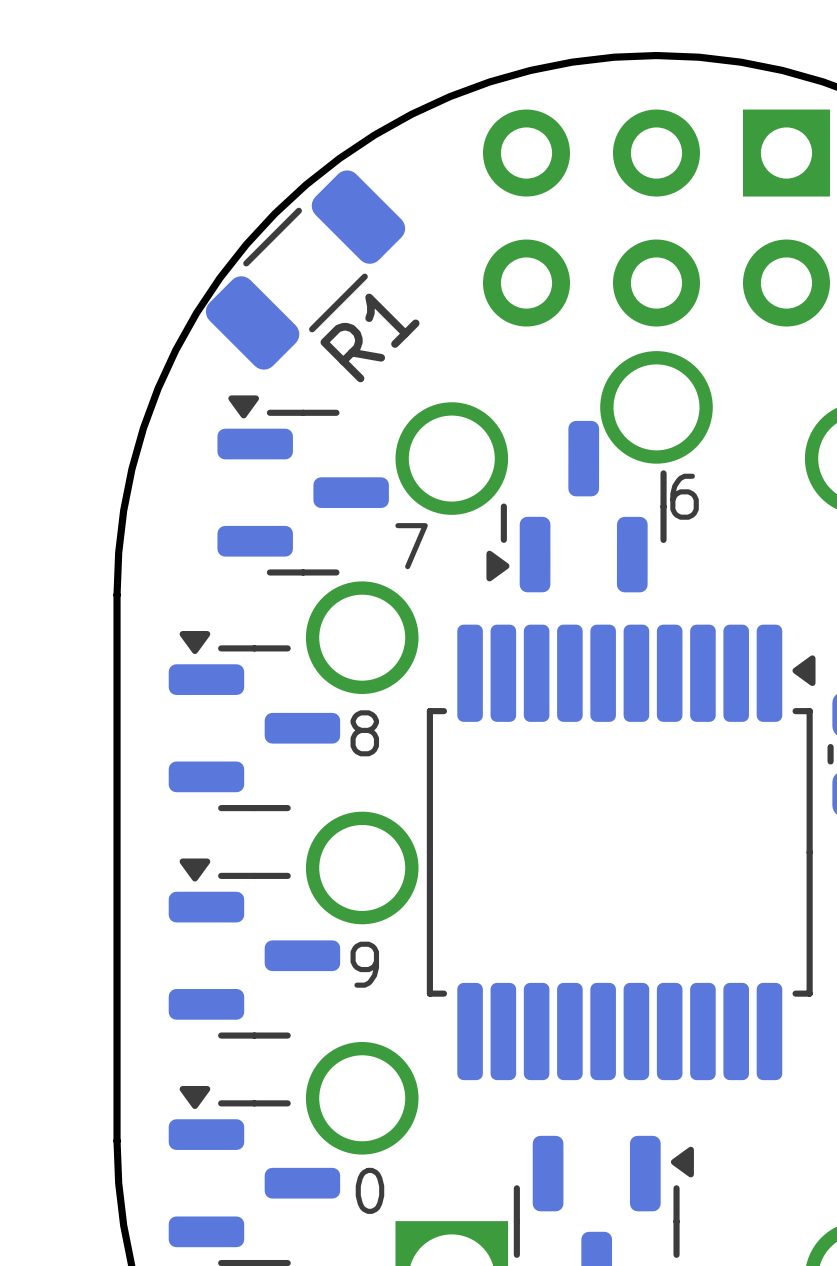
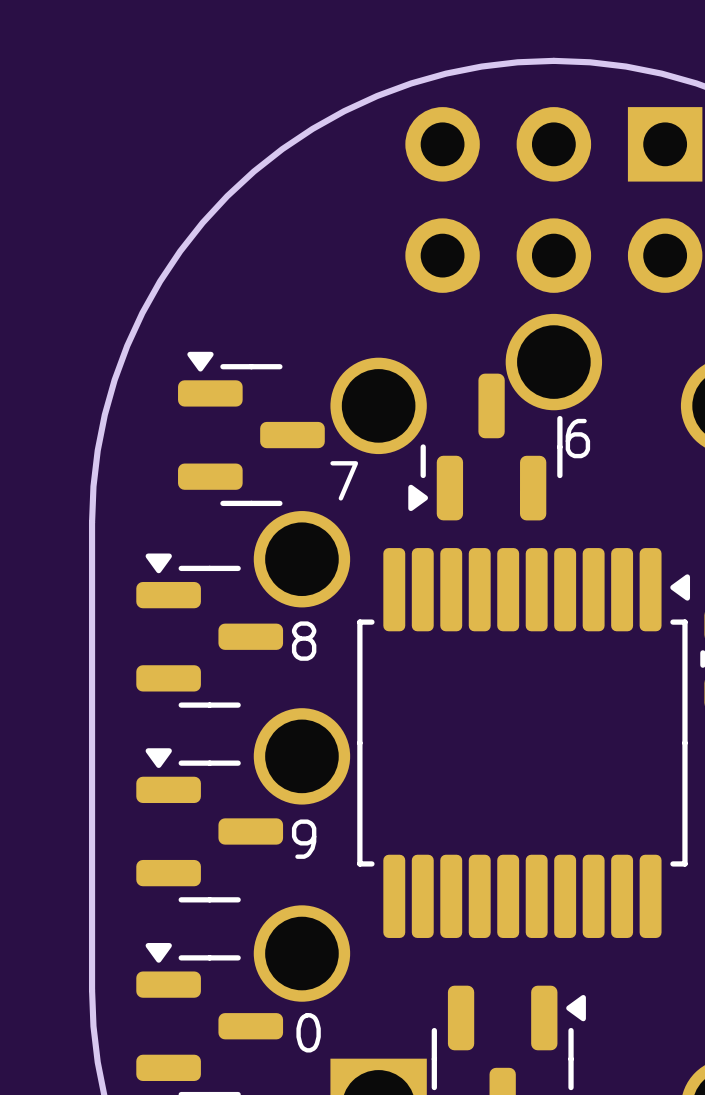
R1: (305, 270) -> none

